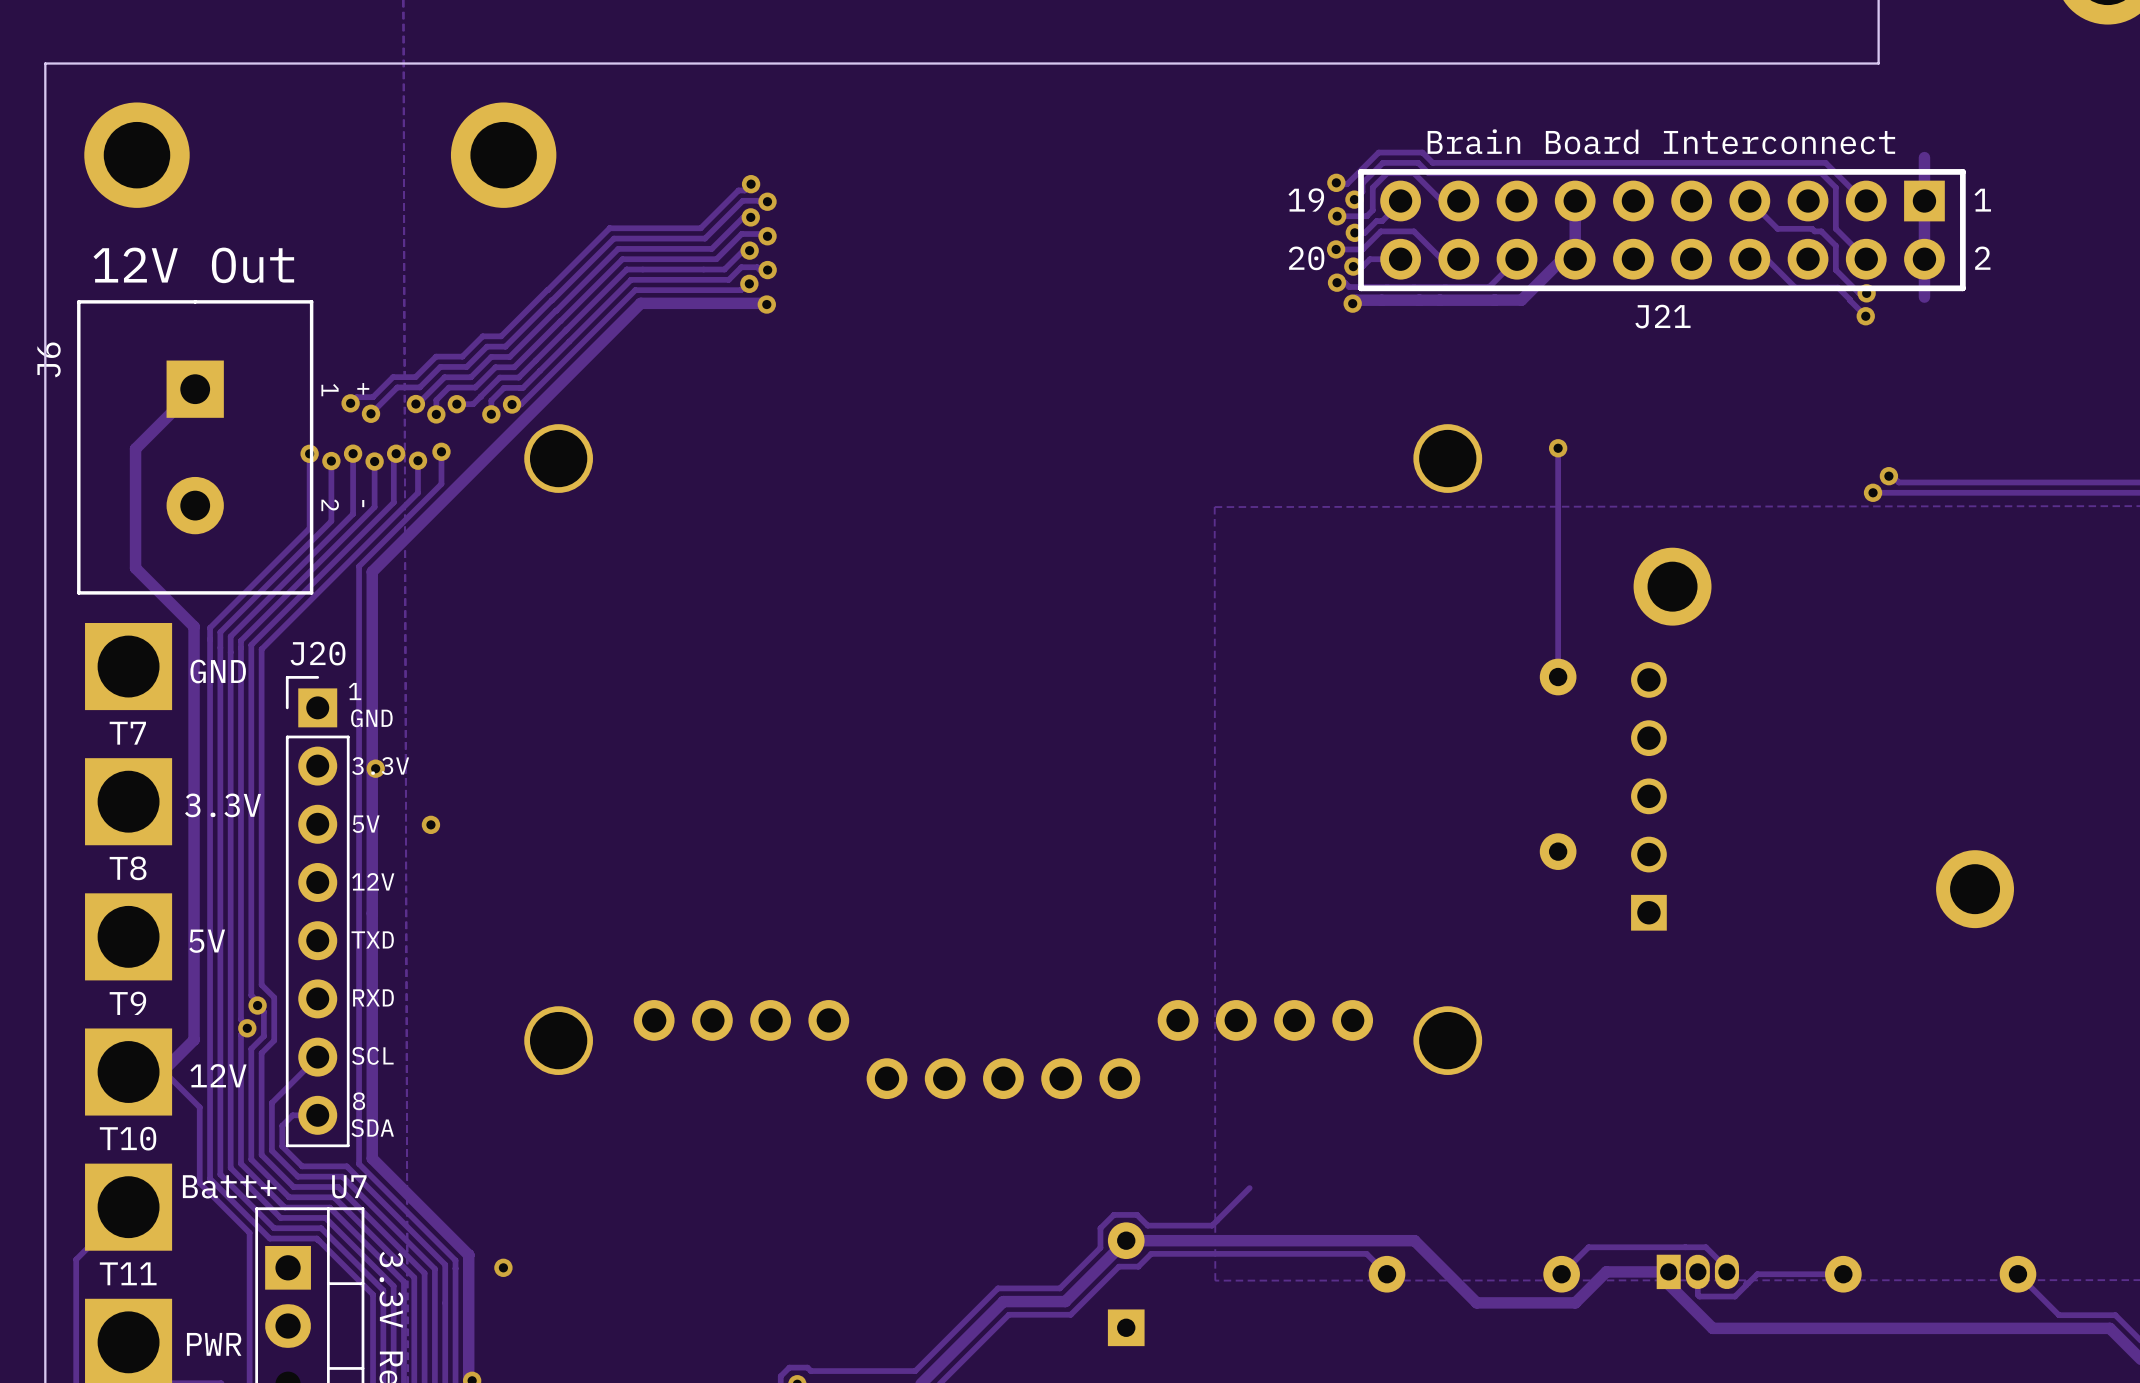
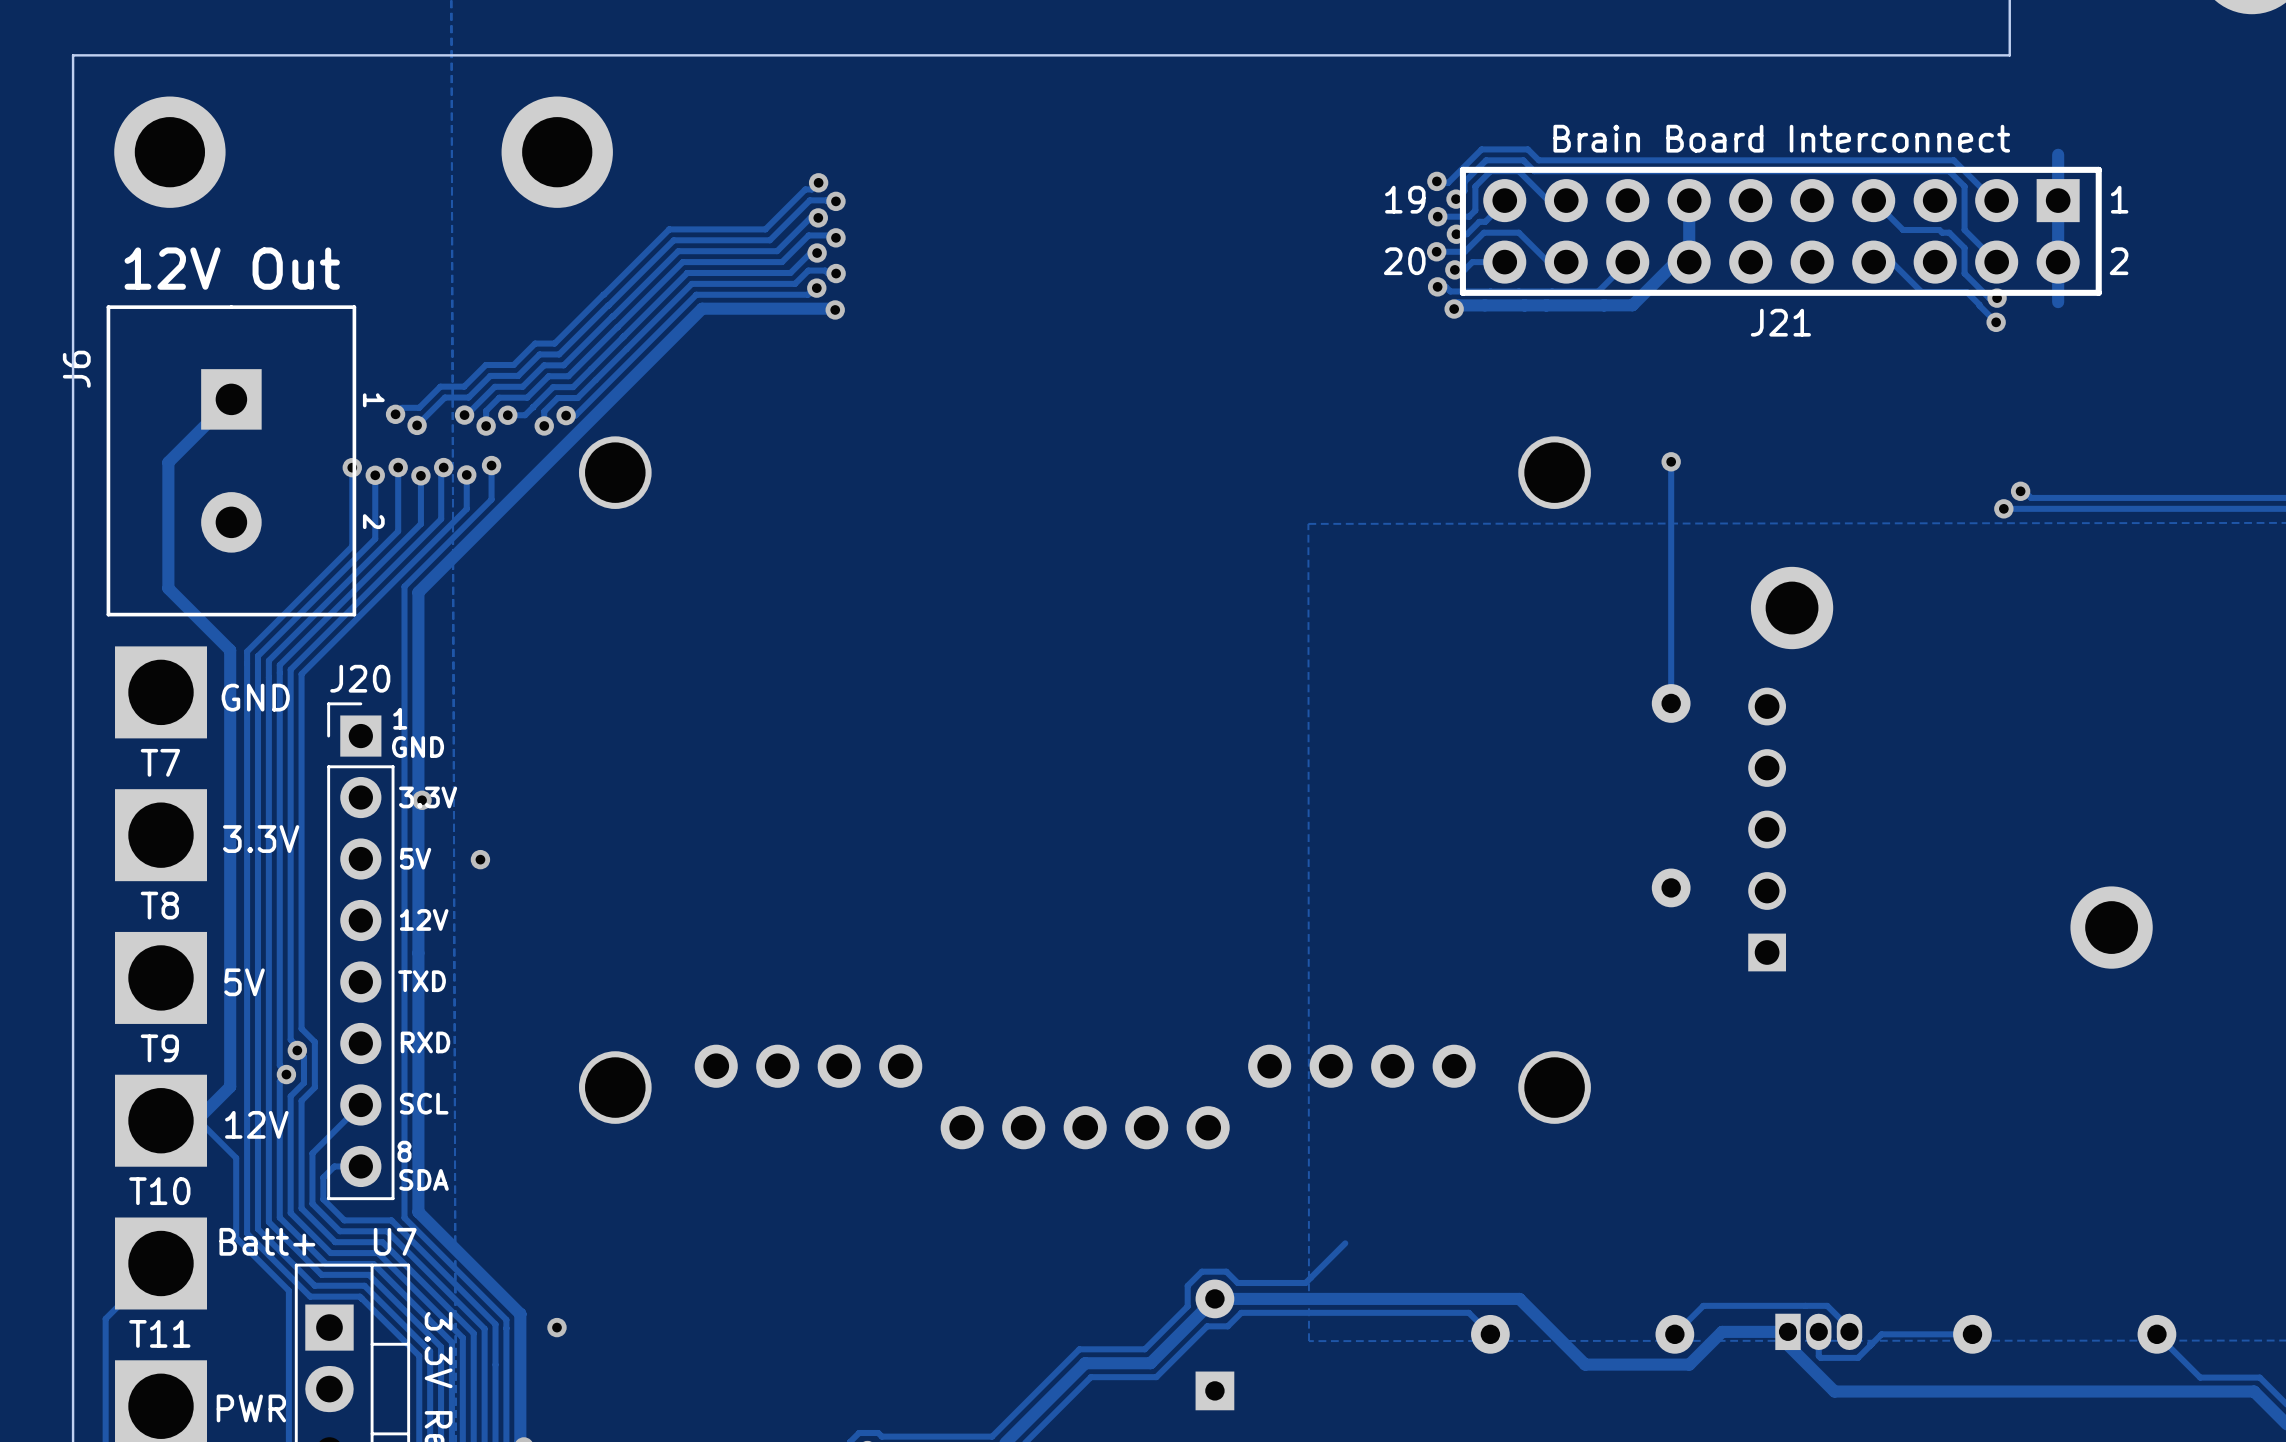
text: + (363, 388) -> none
text: - (363, 503) -> none

